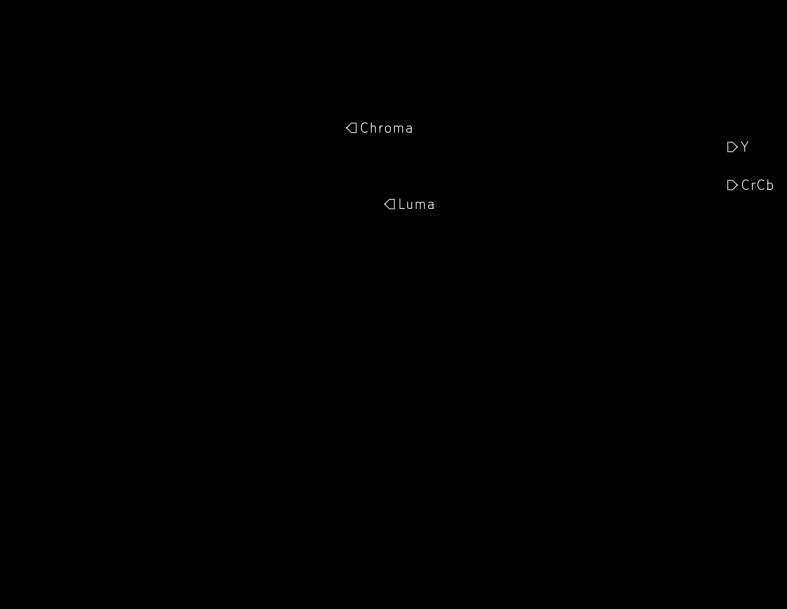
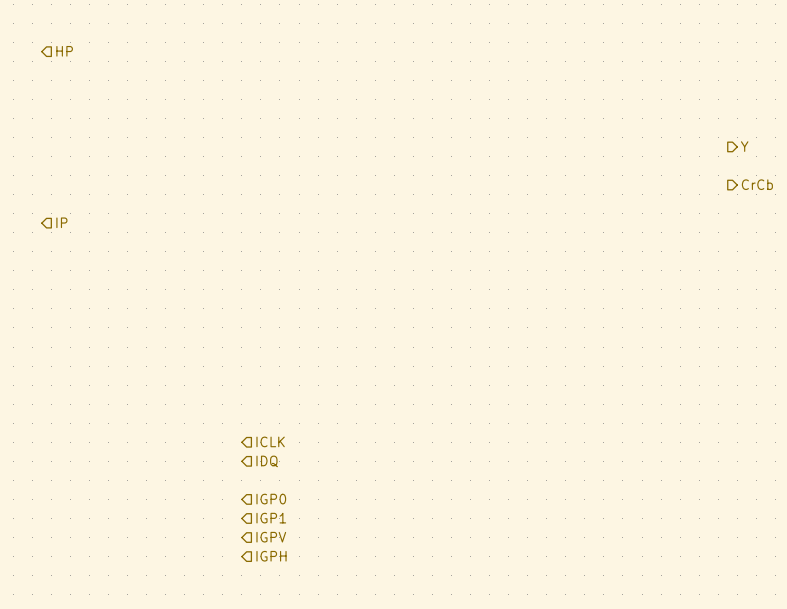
hierarchical label: none -> HP (64, 51)
hierarchical label: Chroma (386, 127) -> none
hierarchical label: Luma (416, 203) -> none
hierarchical label: none -> IP (61, 222)
hierarchical label: none -> ICLK (270, 441)
hierarchical label: none -> IDQ (267, 461)
hierarchical label: none -> IGP0 (271, 499)
hierarchical label: none -> IGP1 (271, 518)
hierarchical label: none -> IGPV (271, 537)
hierarchical label: none -> IGPH (271, 556)

